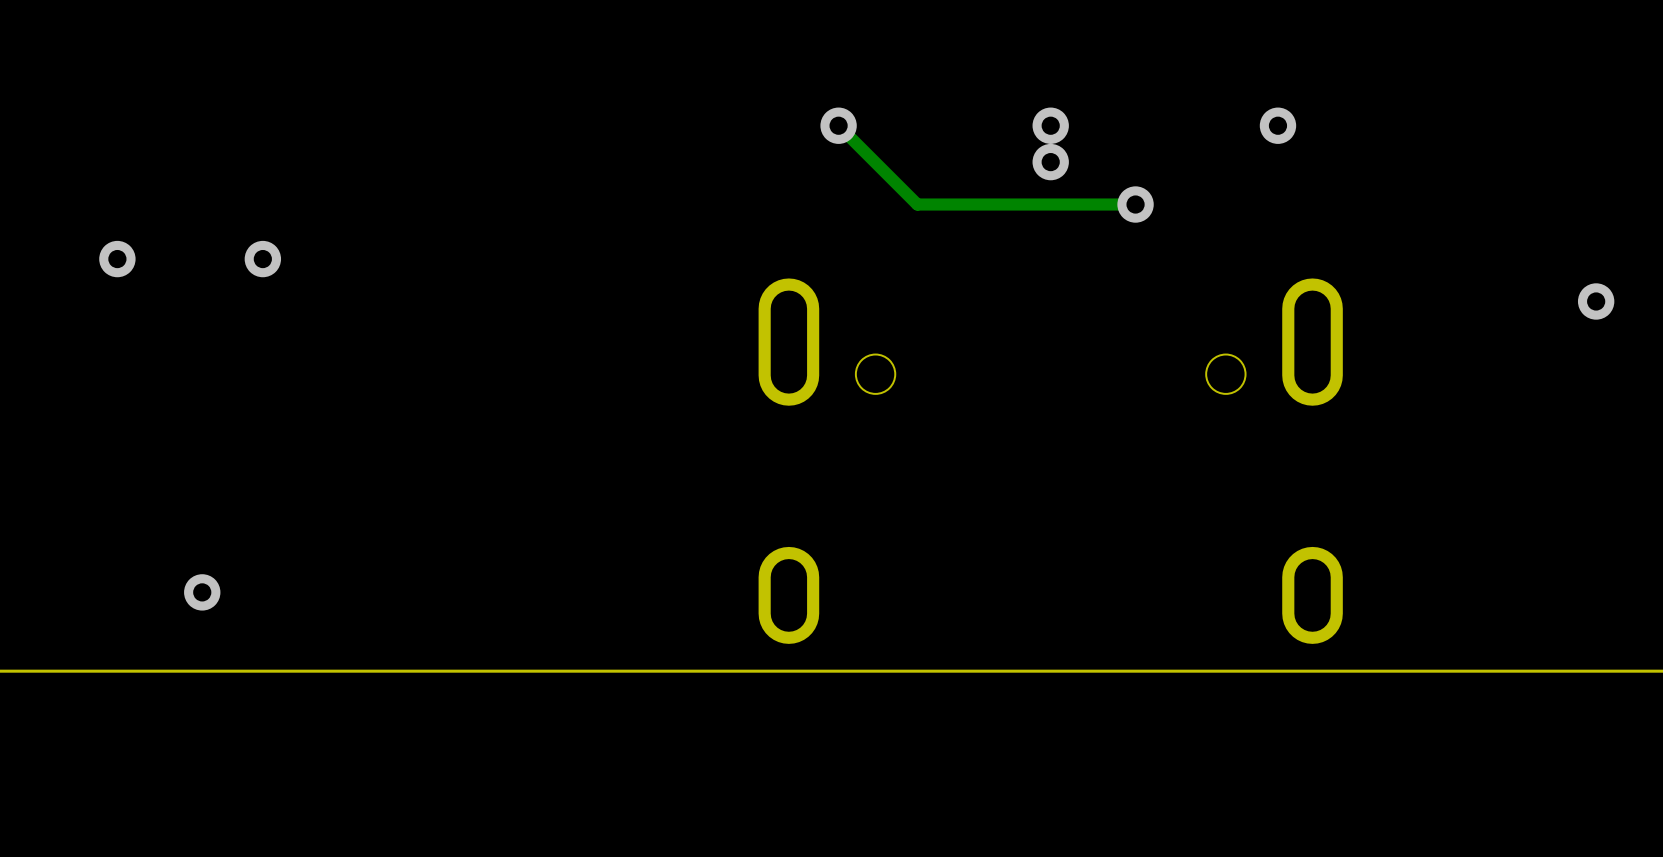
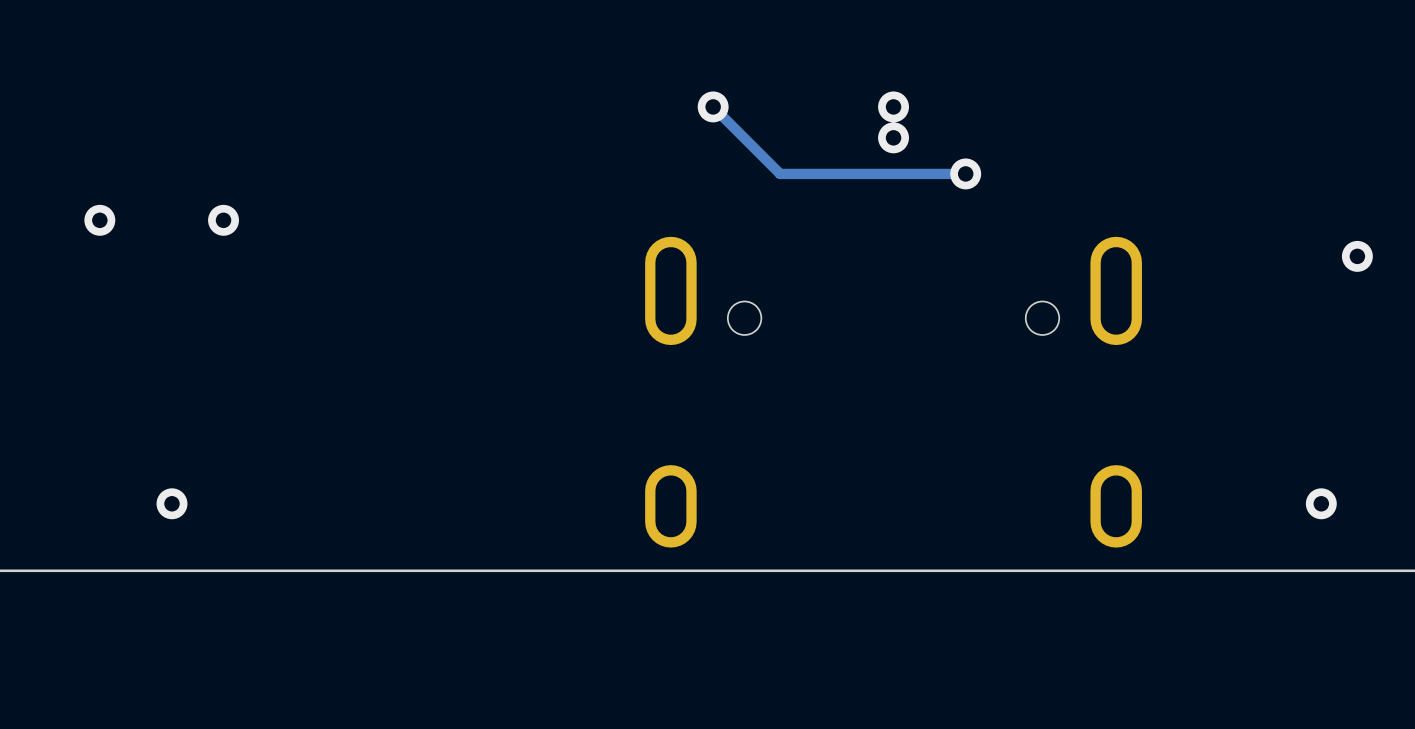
via: (1277, 125) -> none
via: none -> (1321, 503)

